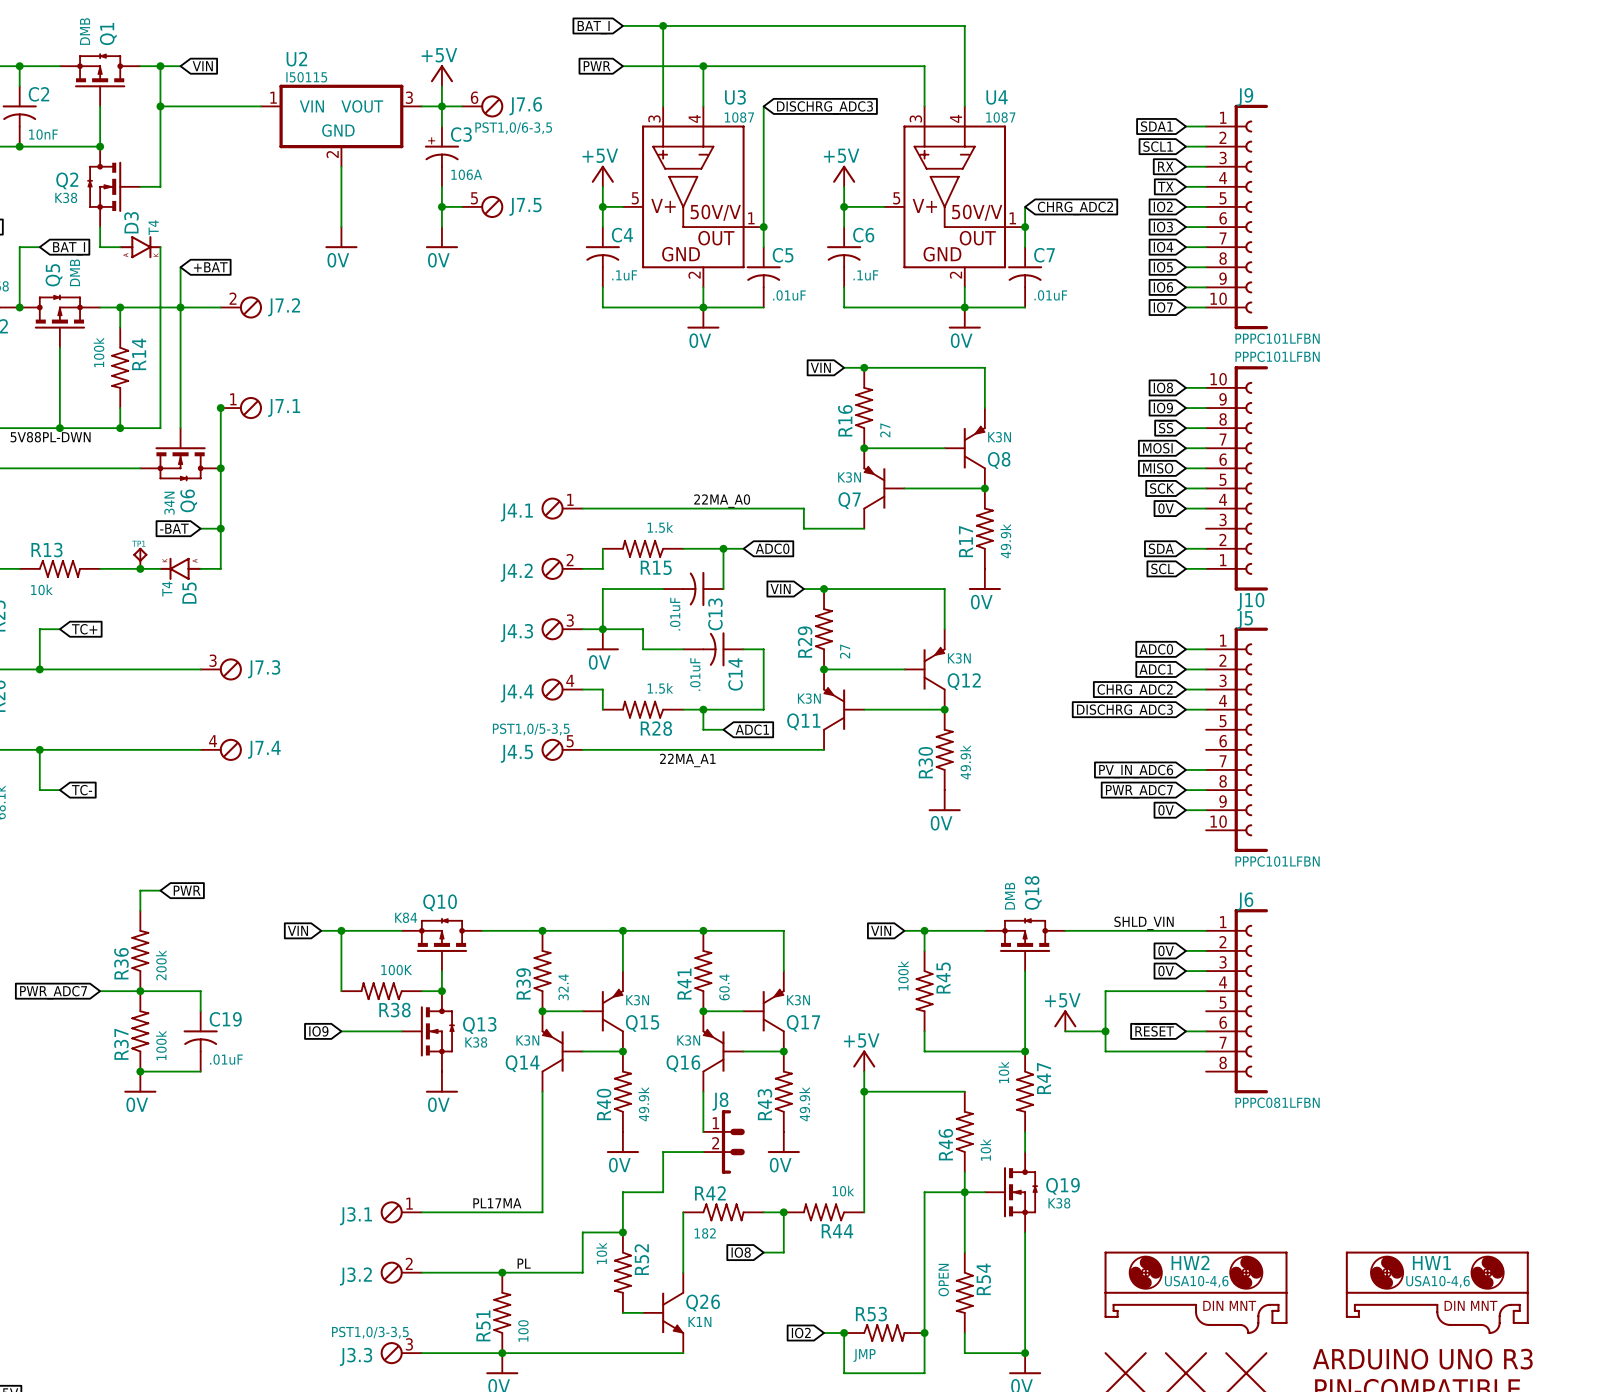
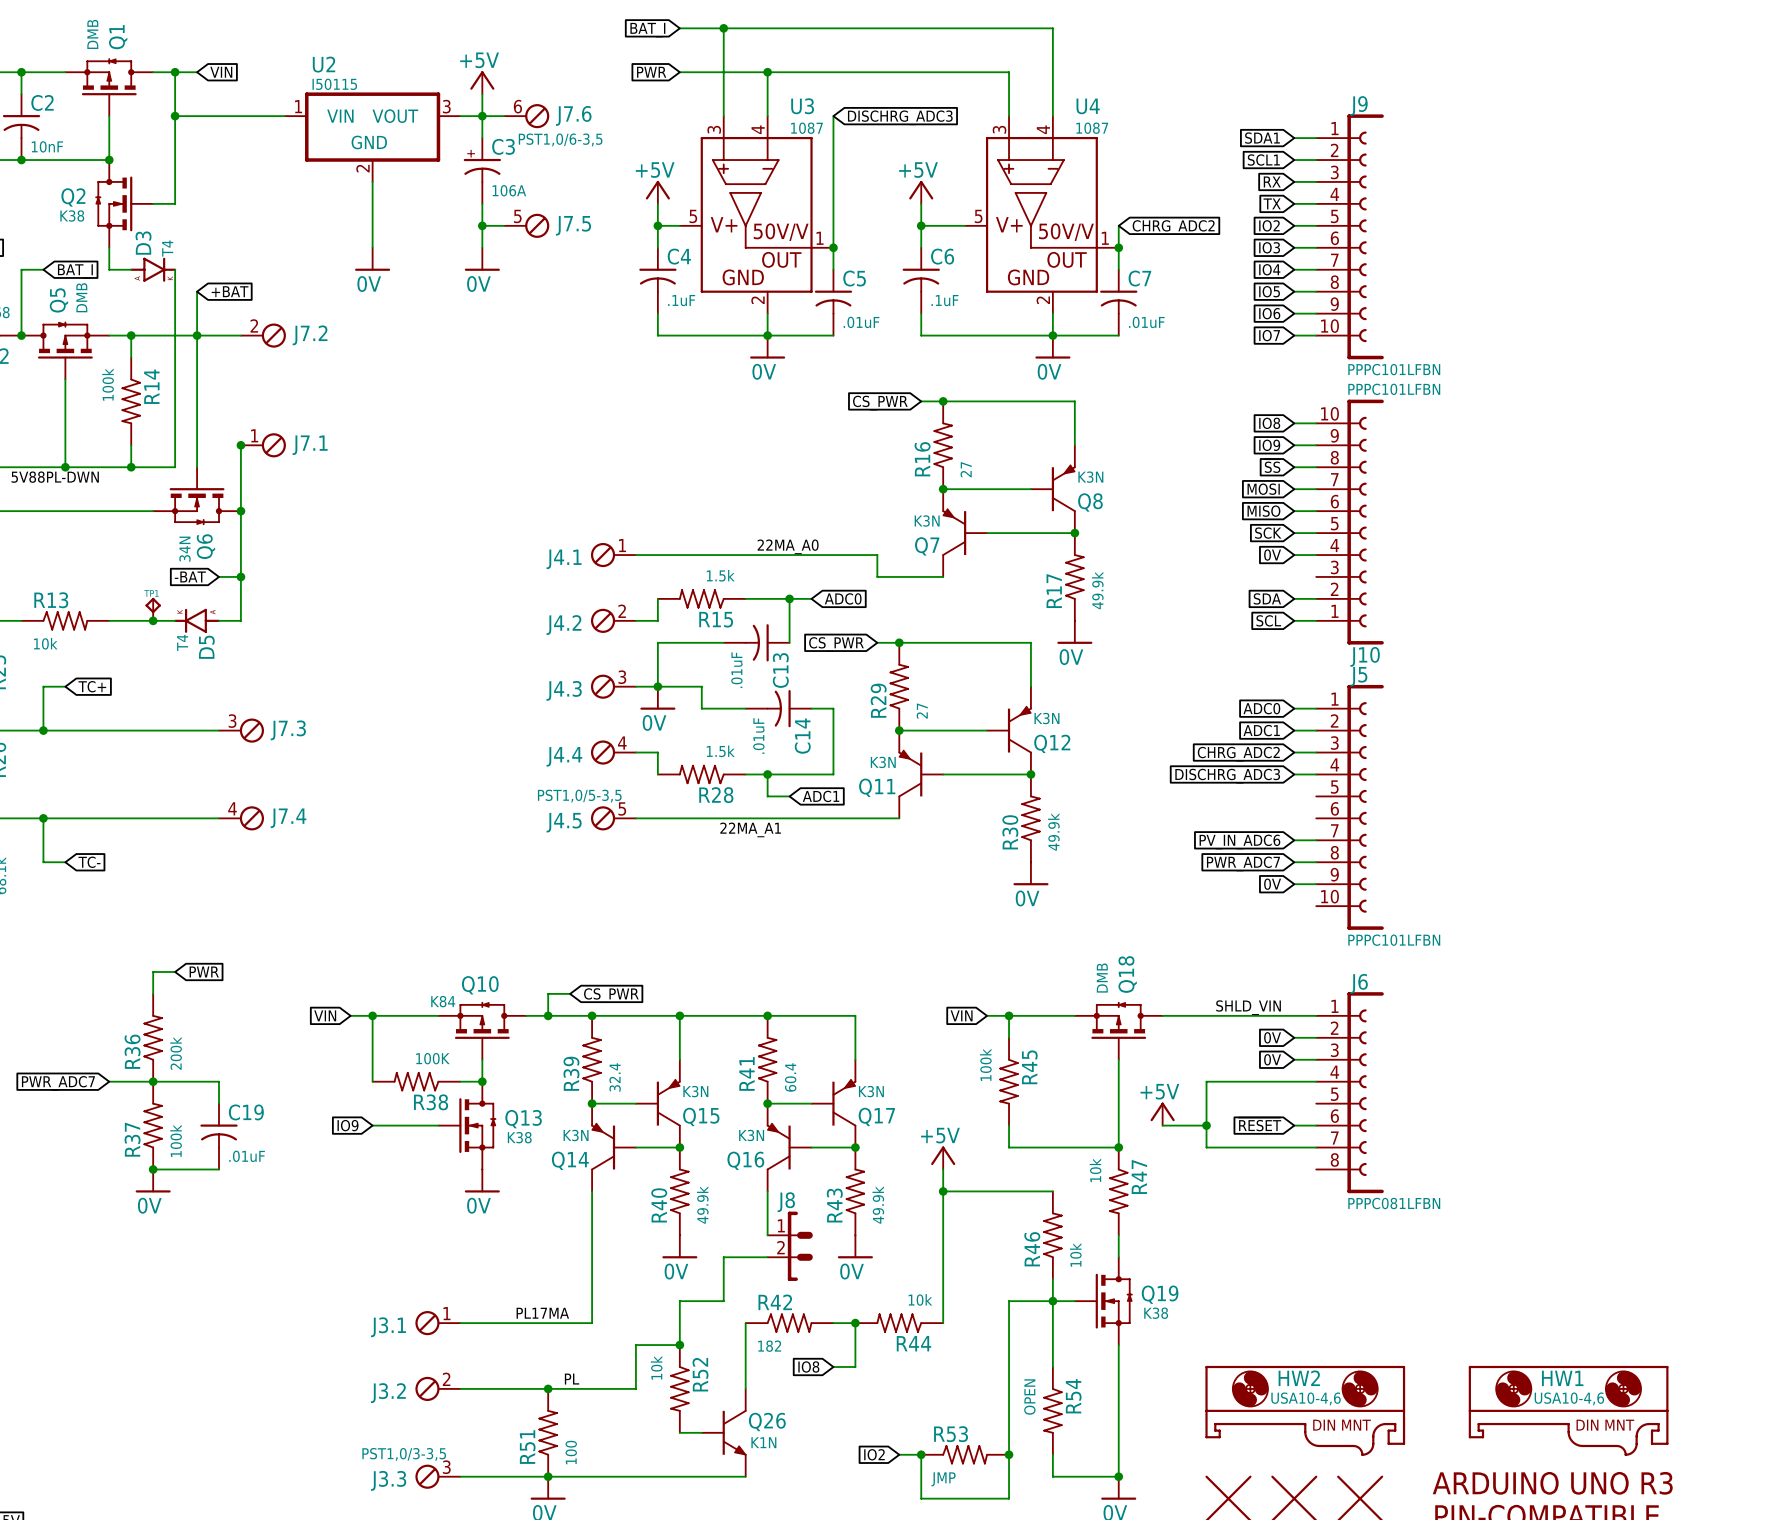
global label: VIN (820, 367) -> CS_PWR (880, 403)
global label: VIN (780, 589) -> CS_PWR (836, 644)
wire: none -> (570, 993) (548, 993) (548, 1015)
global label: none -> CS_PWR (611, 995)
junction: none -> (548, 1015)

